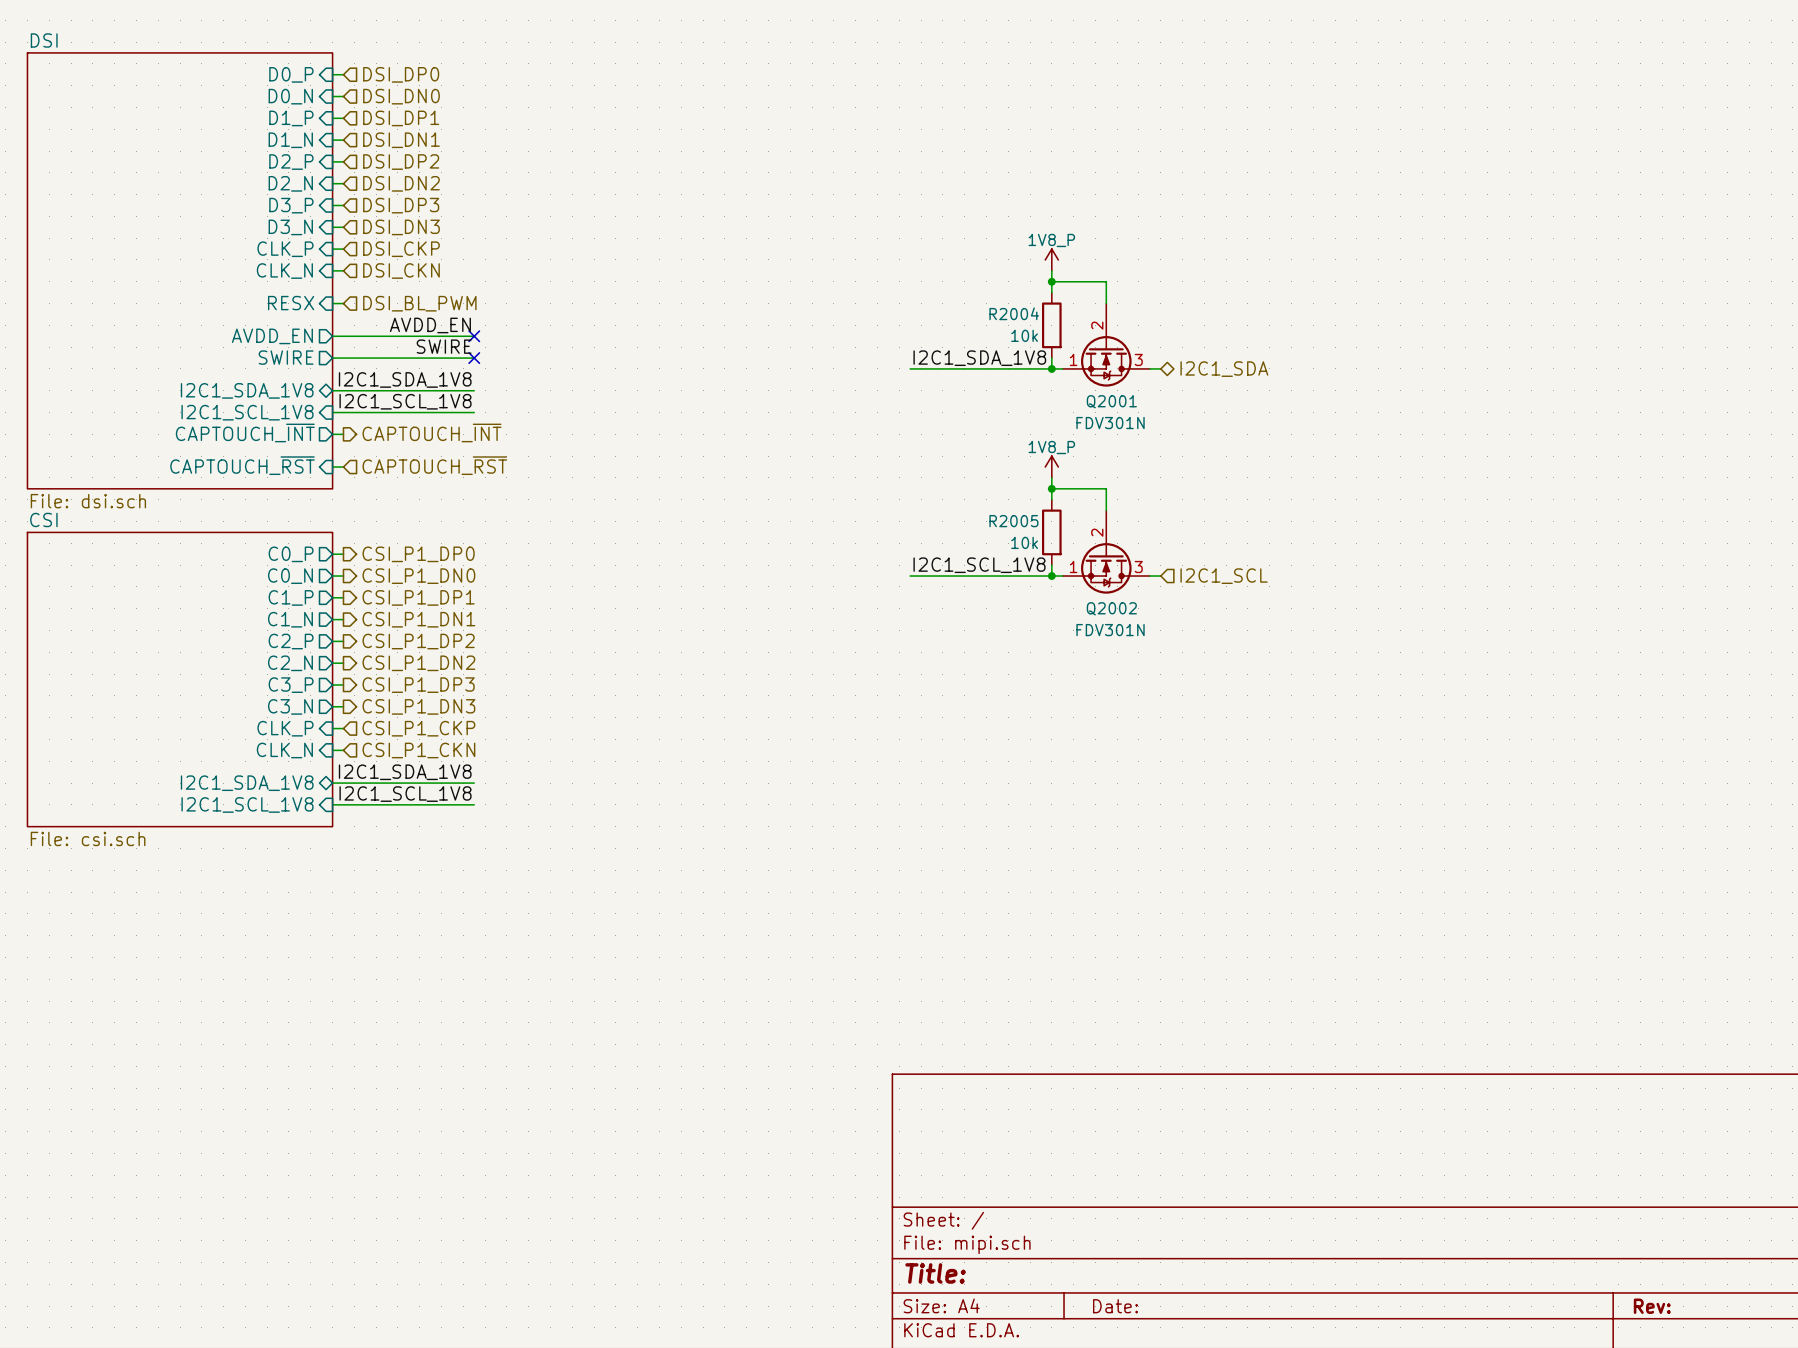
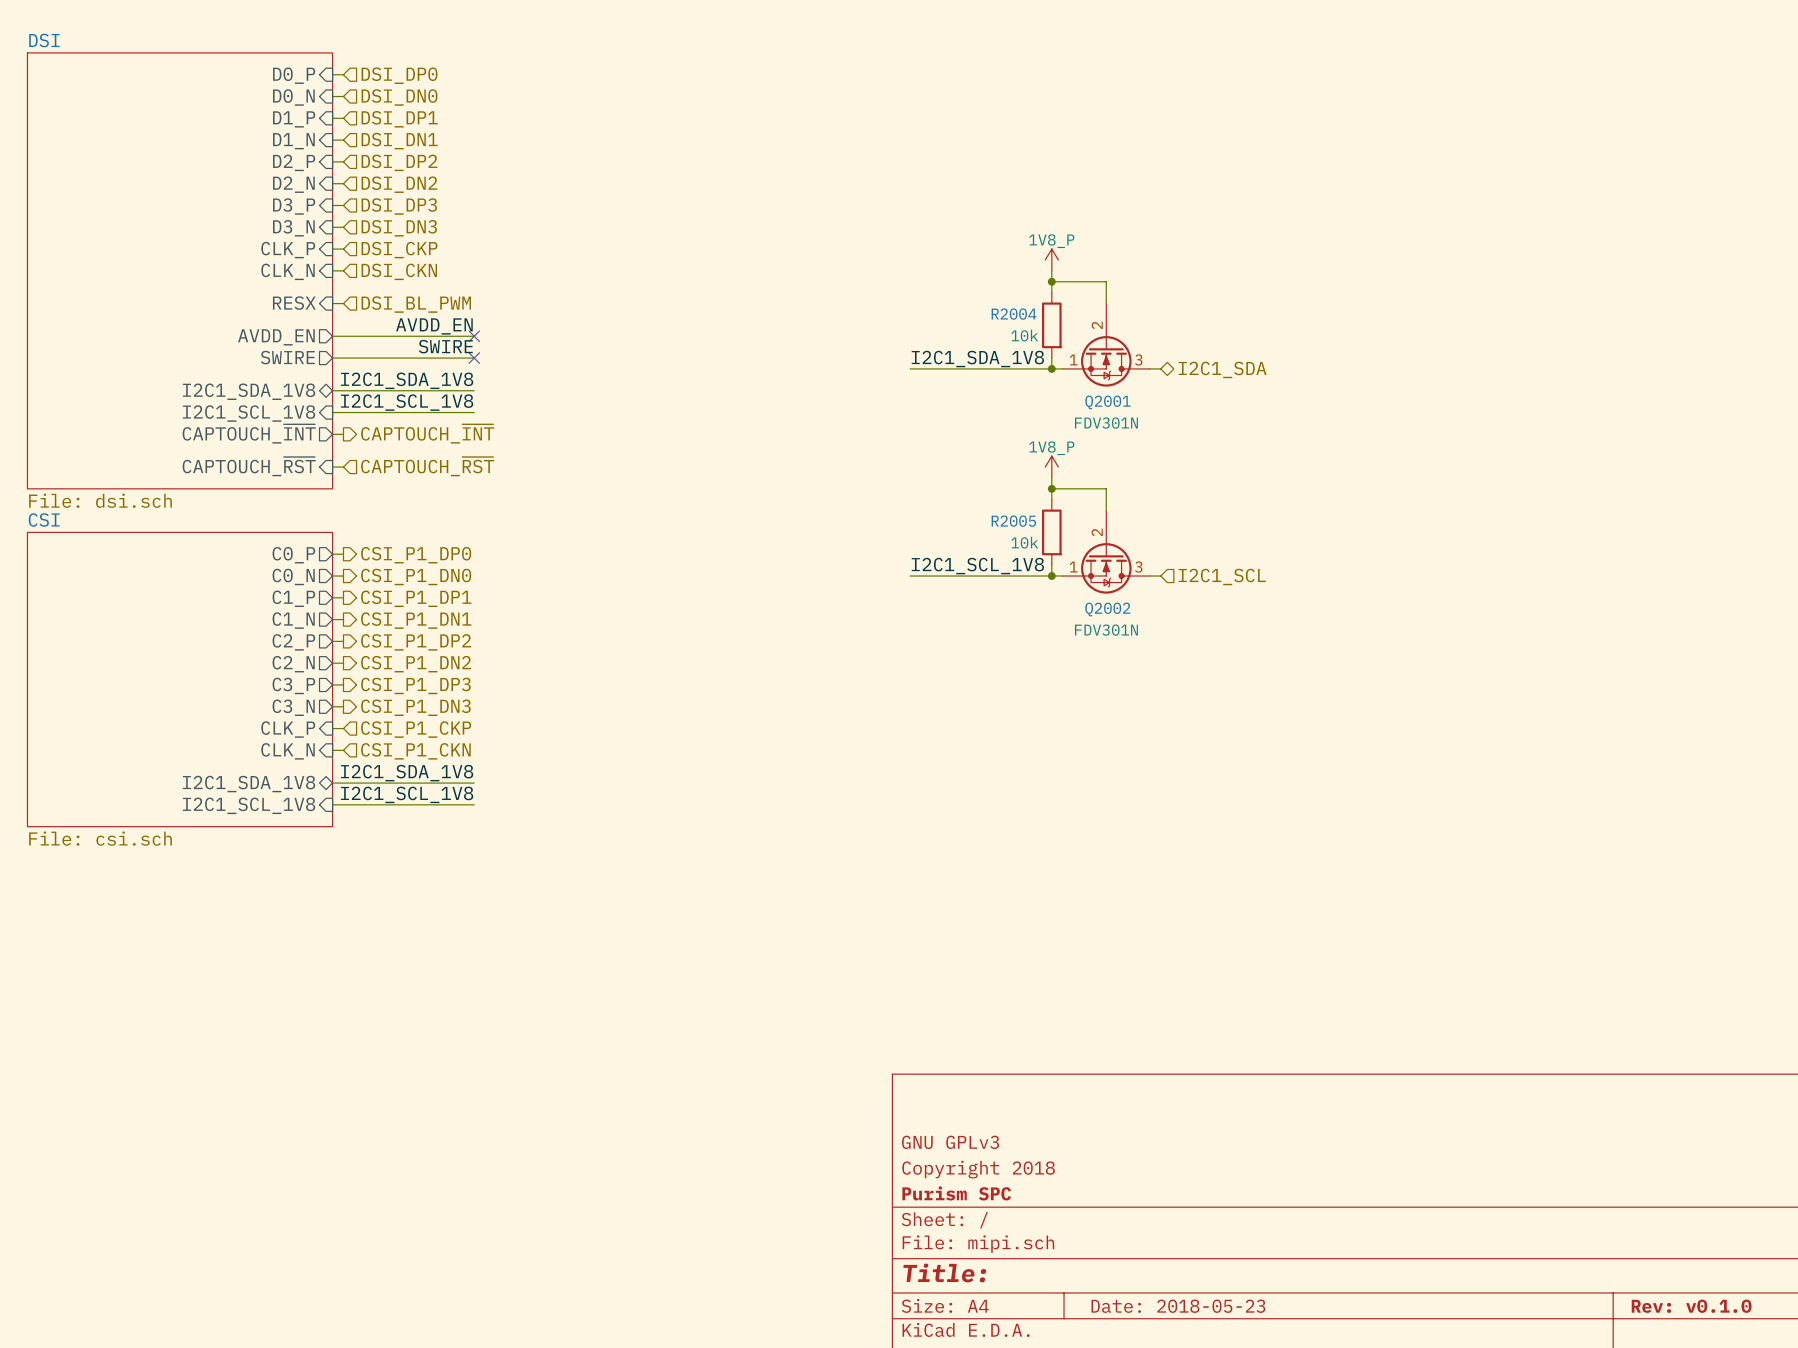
title block: none -> GNU GPLv3 (950, 1142)
title block: none -> Copyright 2018 (978, 1169)
title block: none -> Purism SPC (956, 1193)
title block: Date: (1115, 1306) -> Date: 2018-05-23 (1178, 1306)
title block: Rev: (1652, 1306) -> Rev: v0.1.0 (1691, 1306)

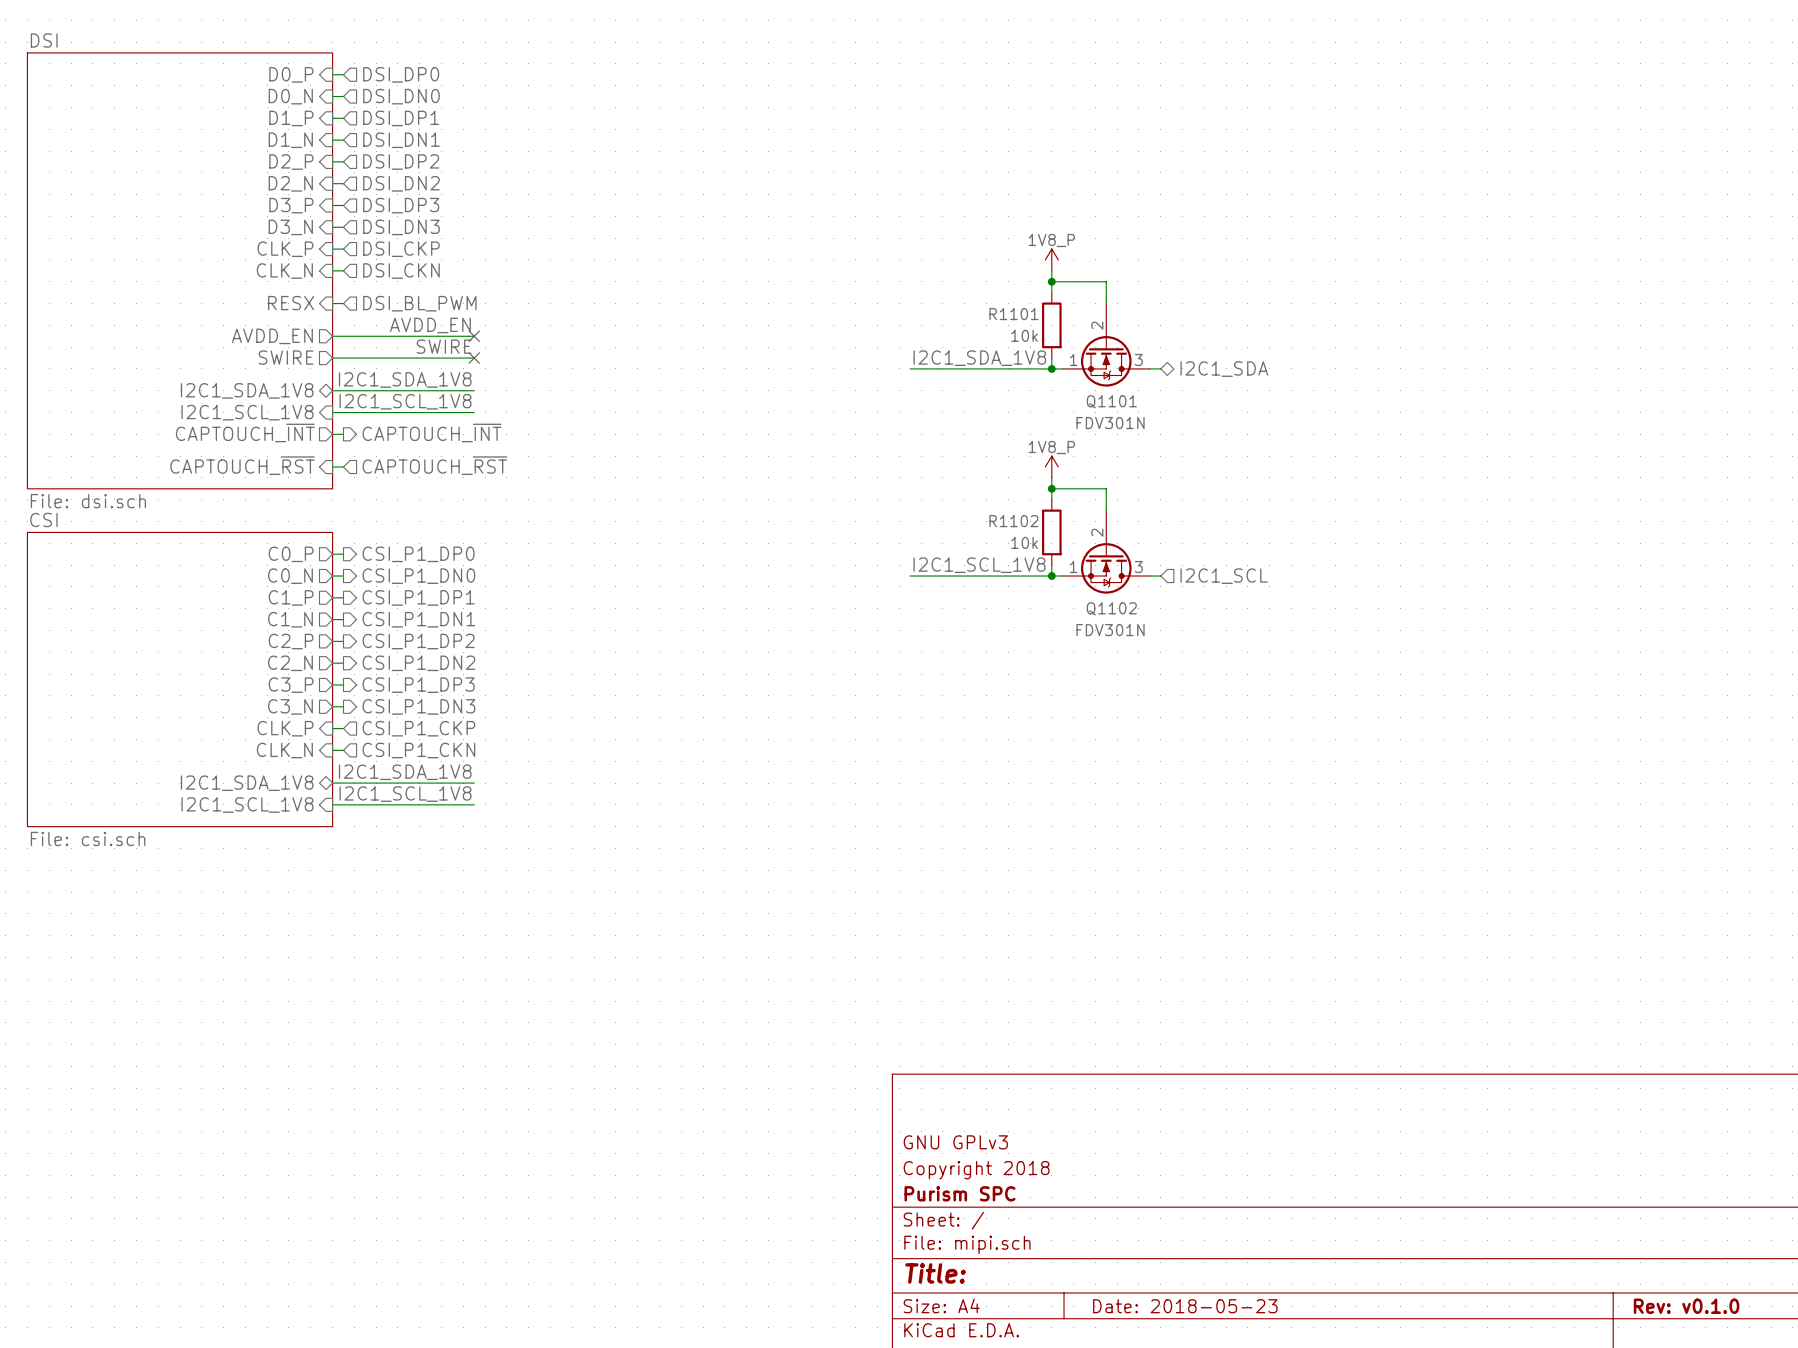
R2004 name: R2004 (1014, 314) -> R1101 (1013, 314)
Q2001 name: Q2001 (1107, 402) -> Q1101 (1111, 401)
R2005 name: R2005 (1013, 521) -> R1102 (1013, 521)
Q2002 name: Q2002 (1107, 609) -> Q1102 (1111, 608)

